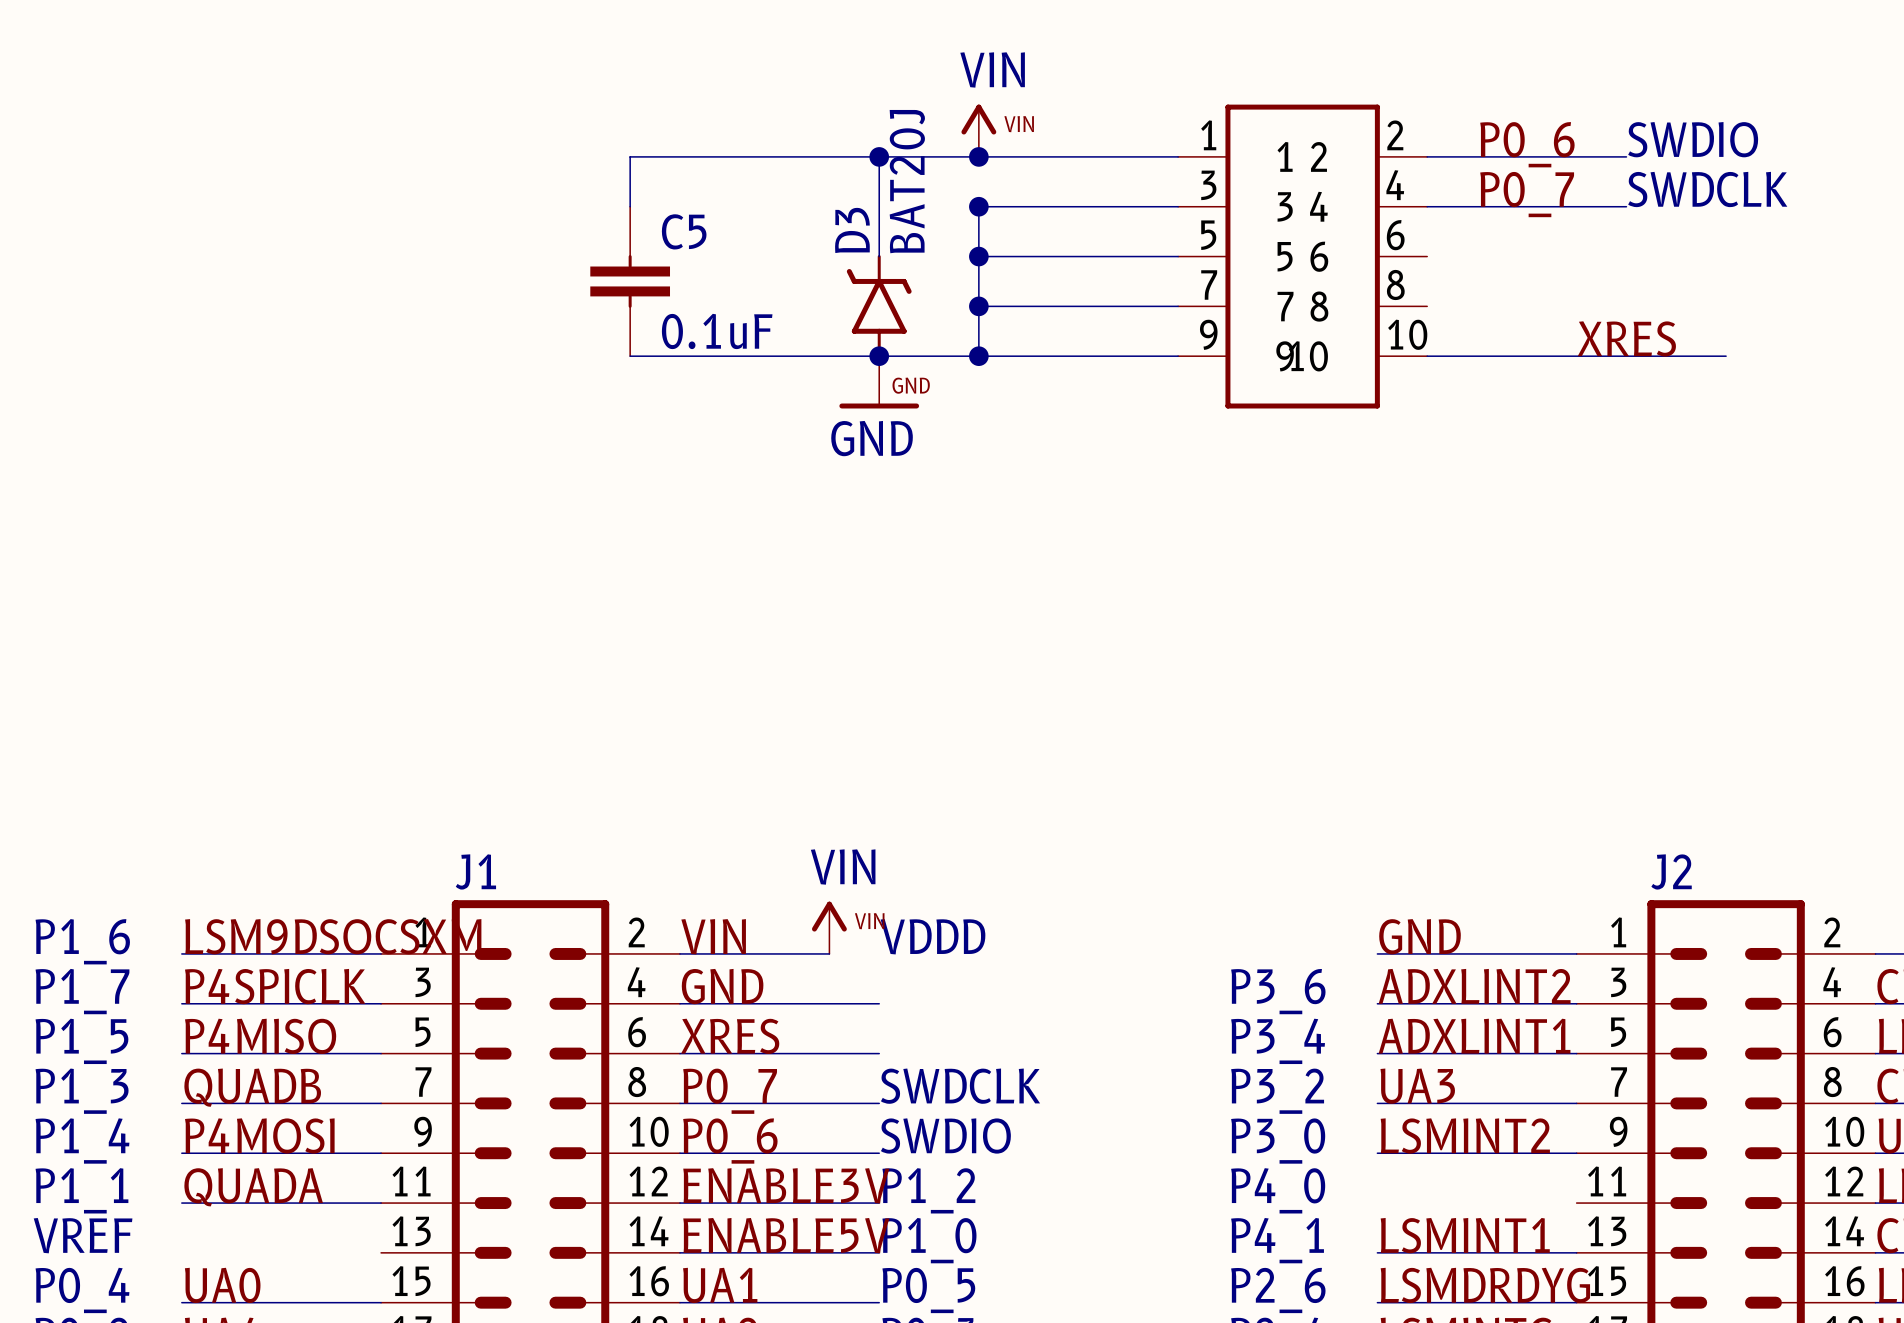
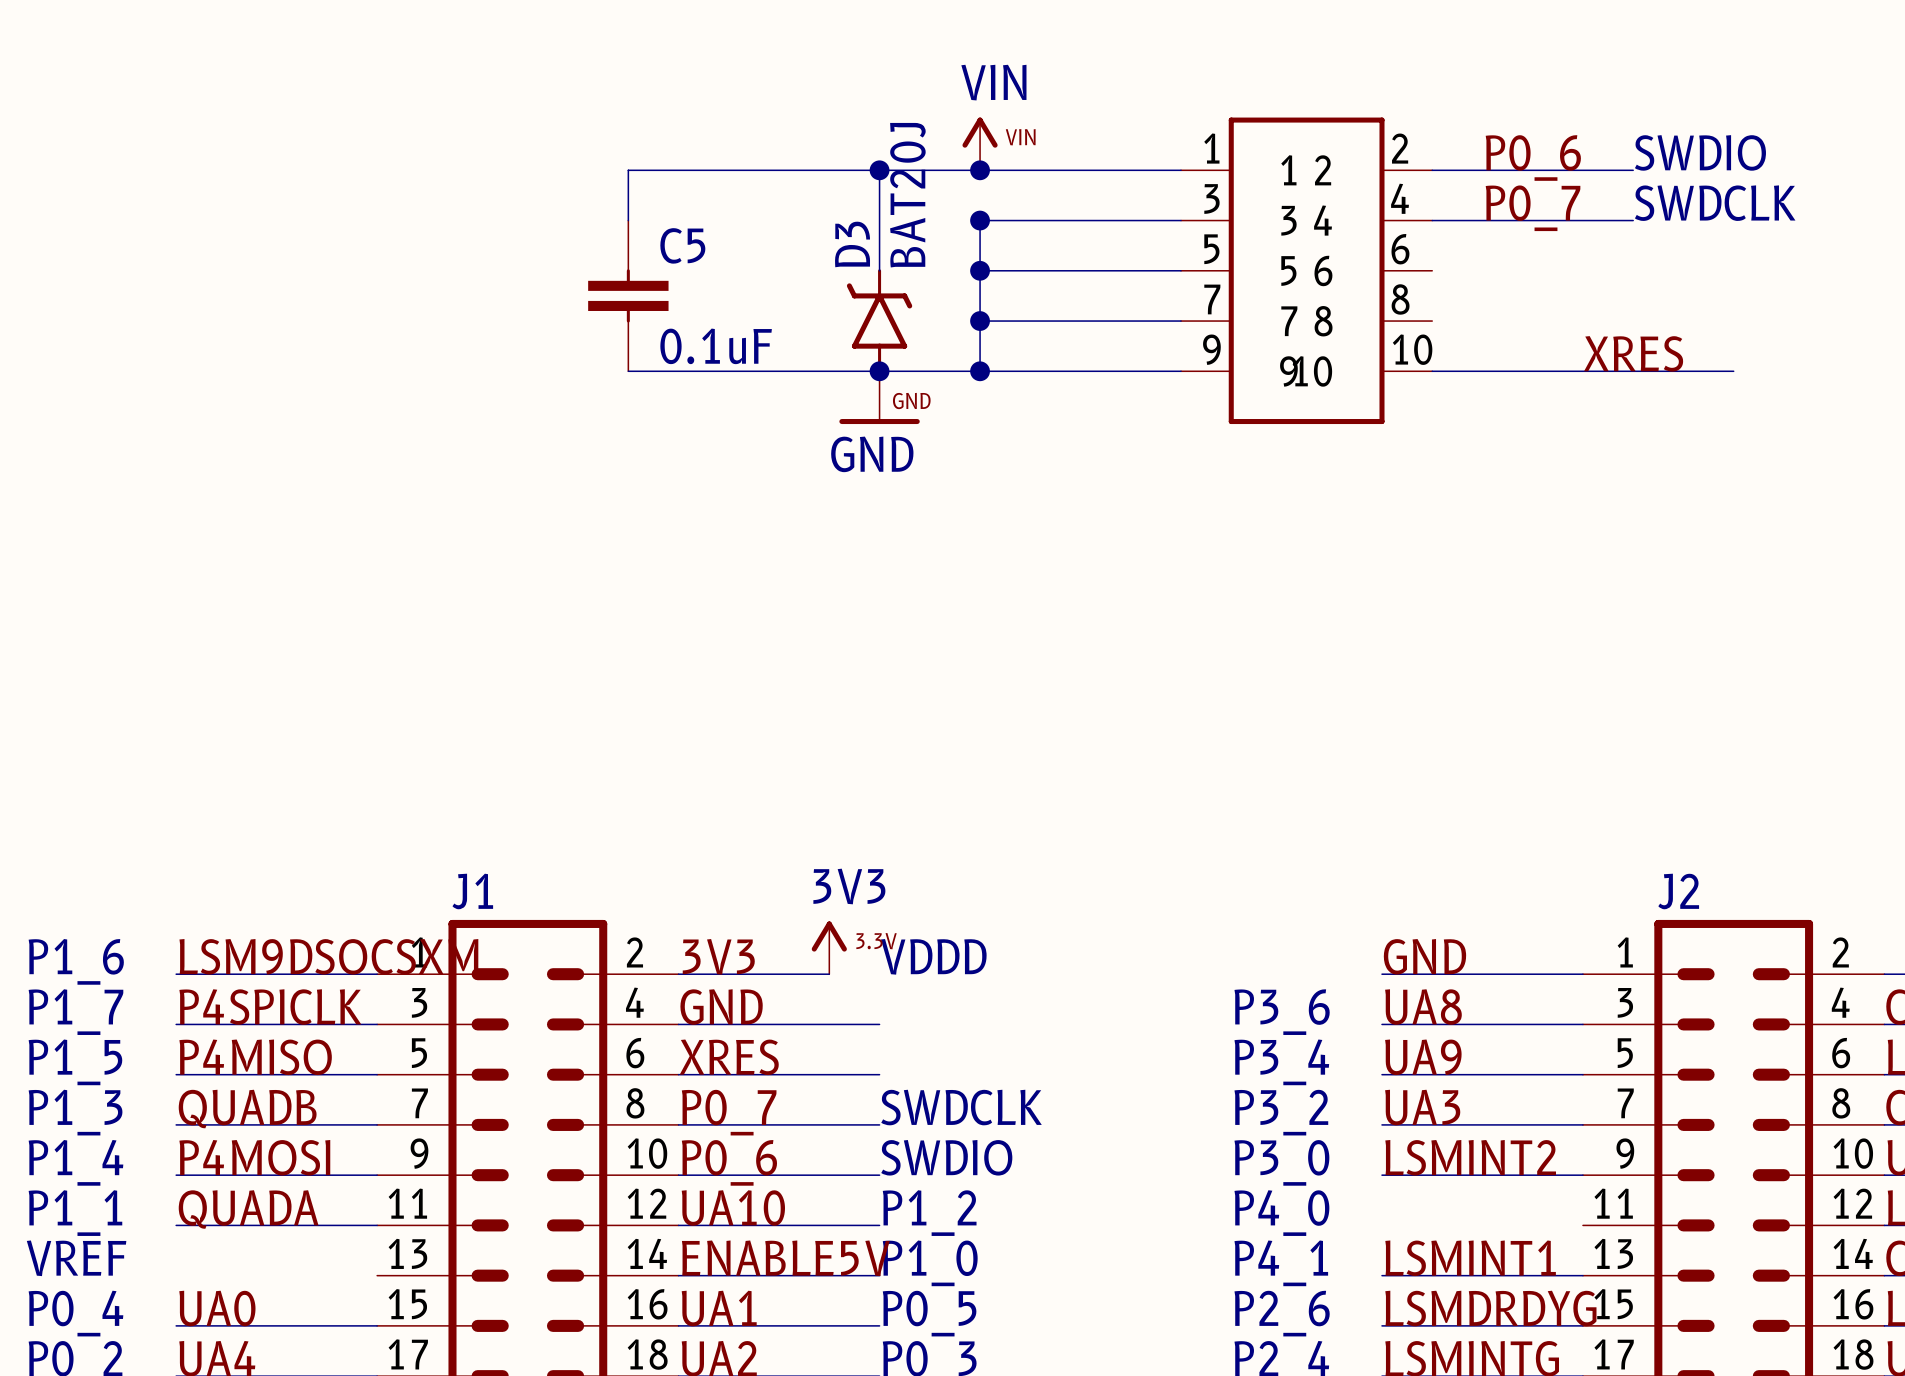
power symbol: VIN (829, 927) -> 3V3 (829, 947)
label: VIN (713, 936) -> 3V3 (718, 956)
label: ADXLINT2 (1474, 986) -> UA8 (1423, 1007)
label: ADXLINT1 (1474, 1036) -> UA9 (1423, 1057)
label: ENABLE3V (786, 1185) -> UA10 (733, 1208)

